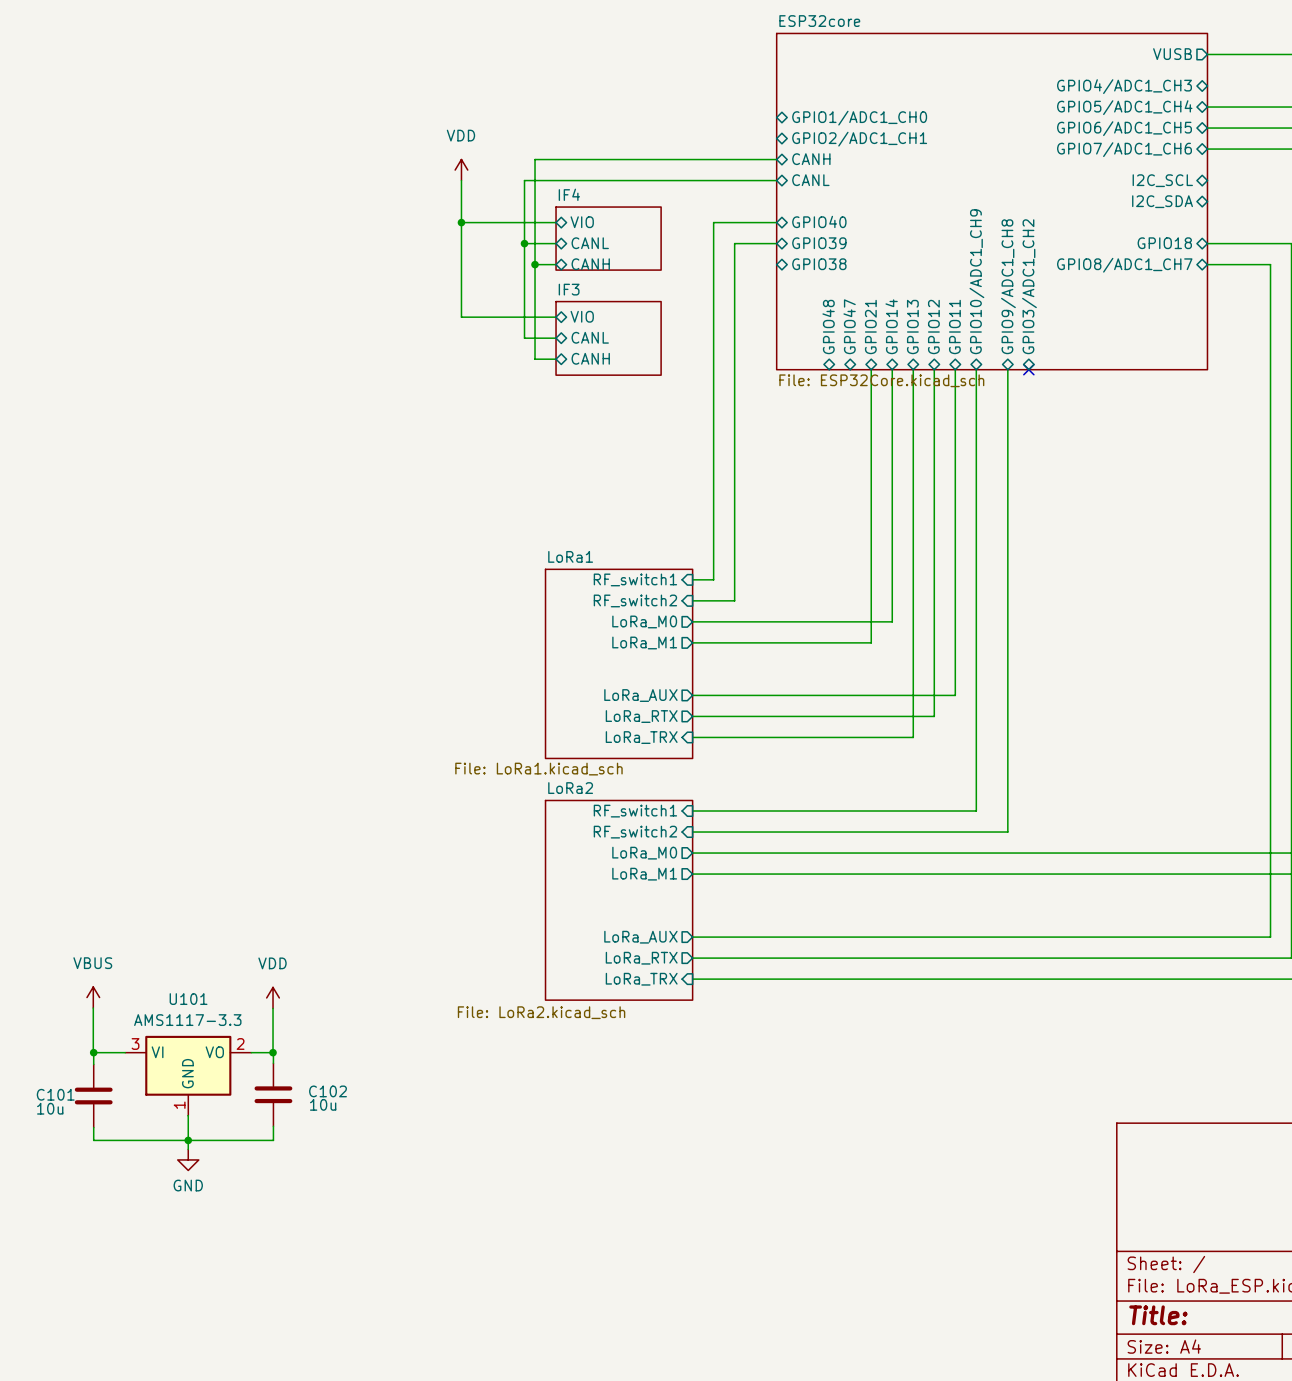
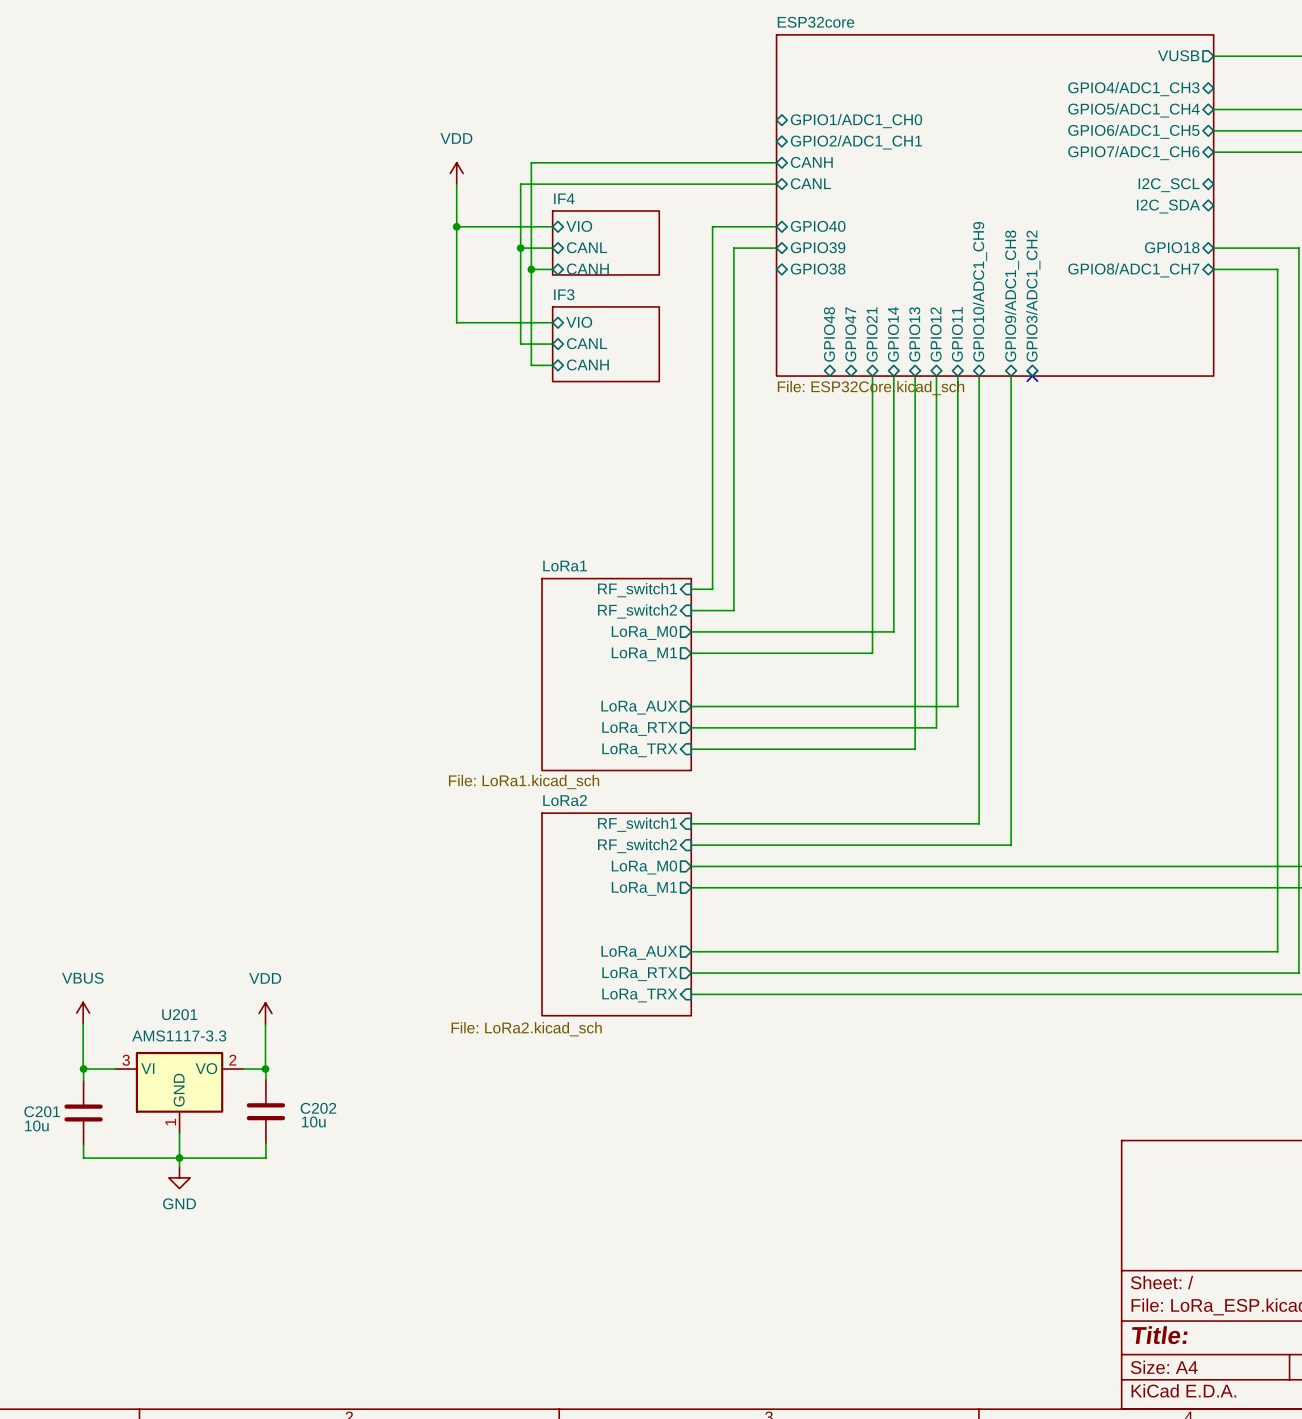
U101 name: U101 (188, 999) -> U201 (179, 1014)
C102 name: C102 (328, 1091) -> C202 (318, 1108)
C101 name: C101 (55, 1094) -> C201 (42, 1111)

